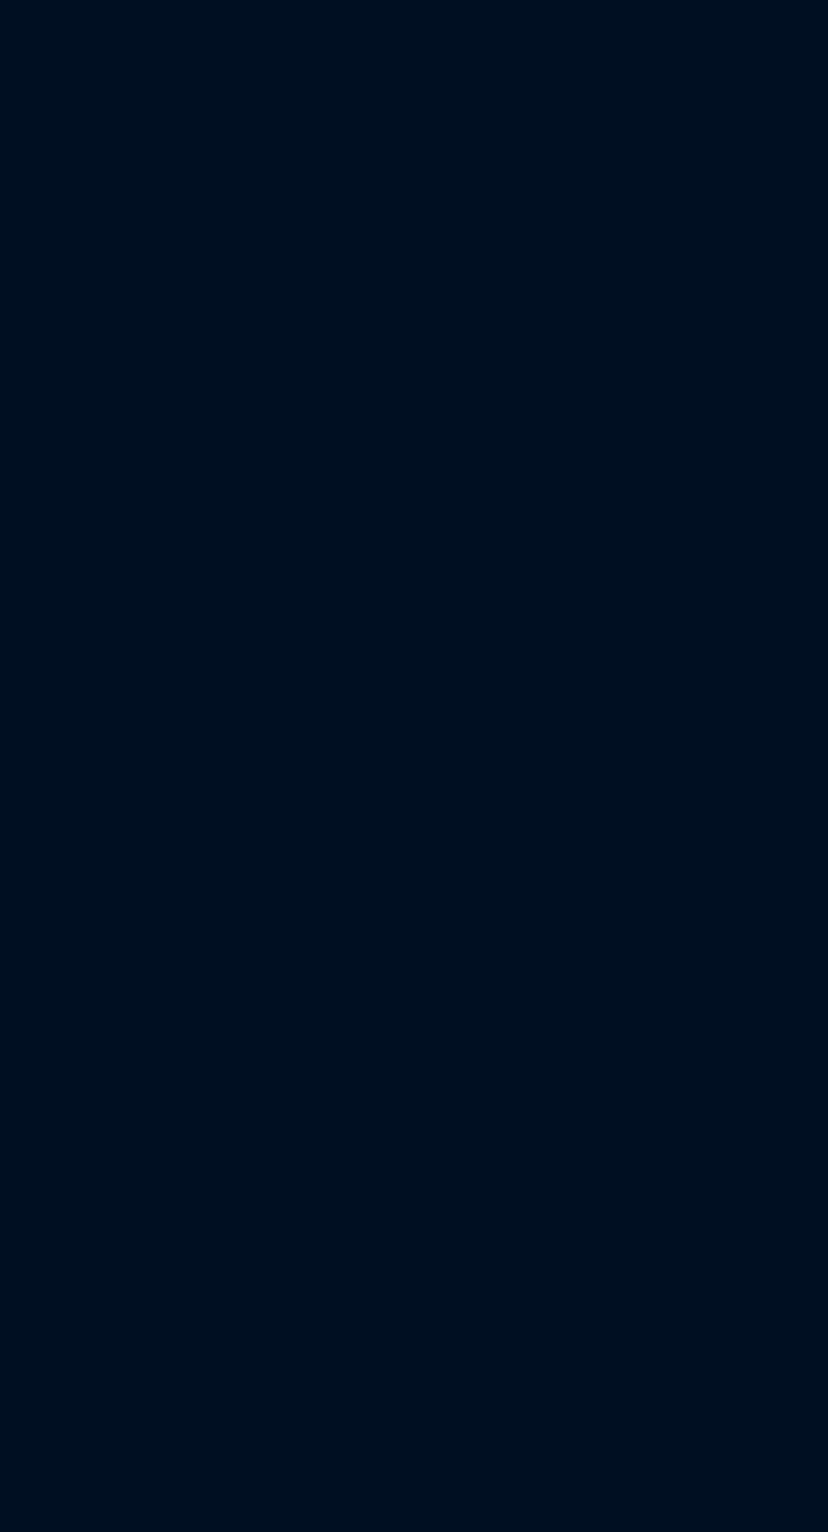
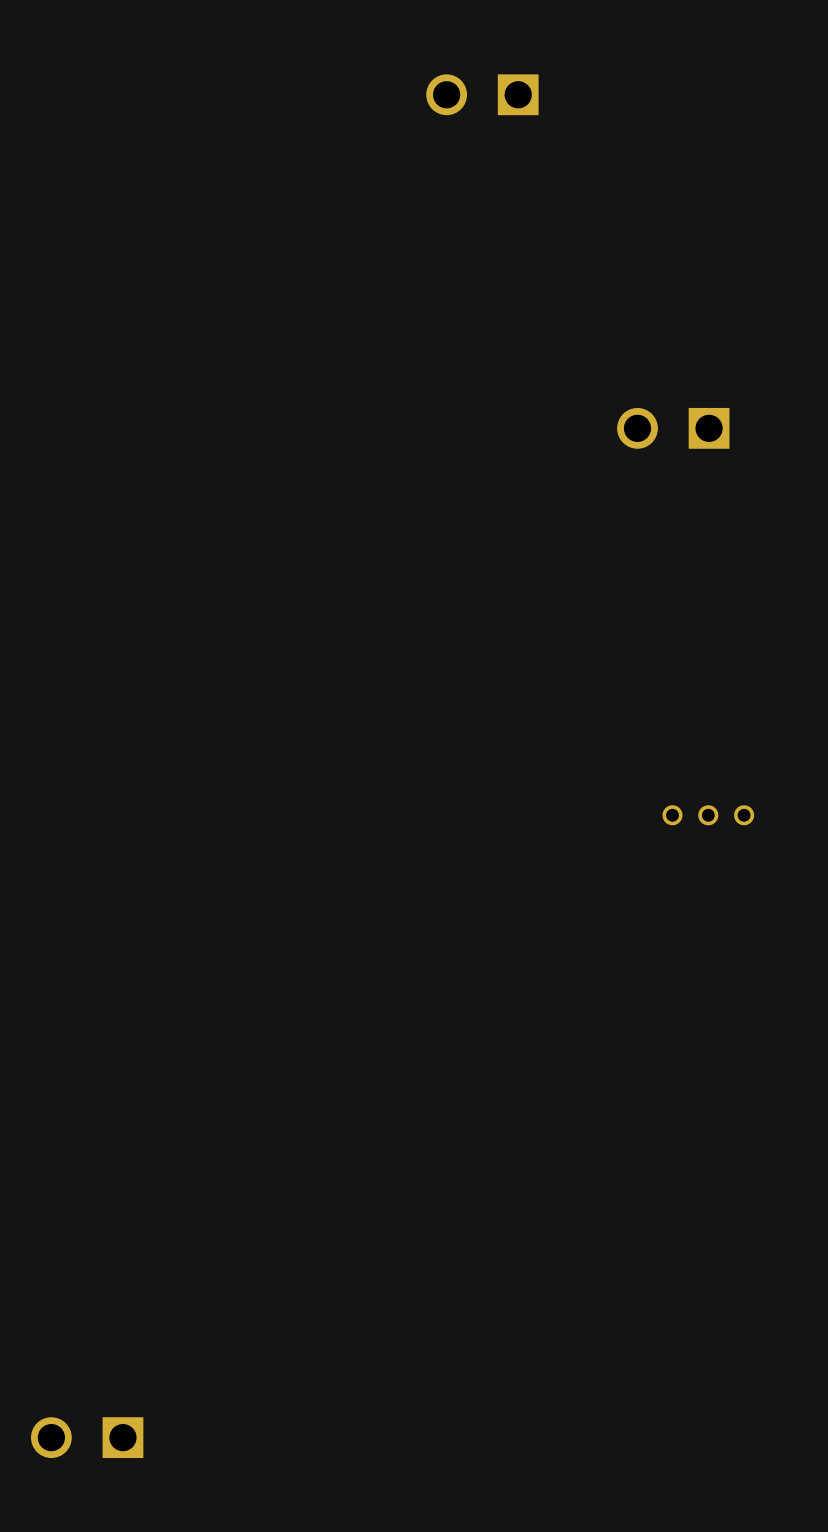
part: none -> (482, 94)
part: none -> (673, 428)
part: none -> (708, 815)
part: none -> (87, 1437)

